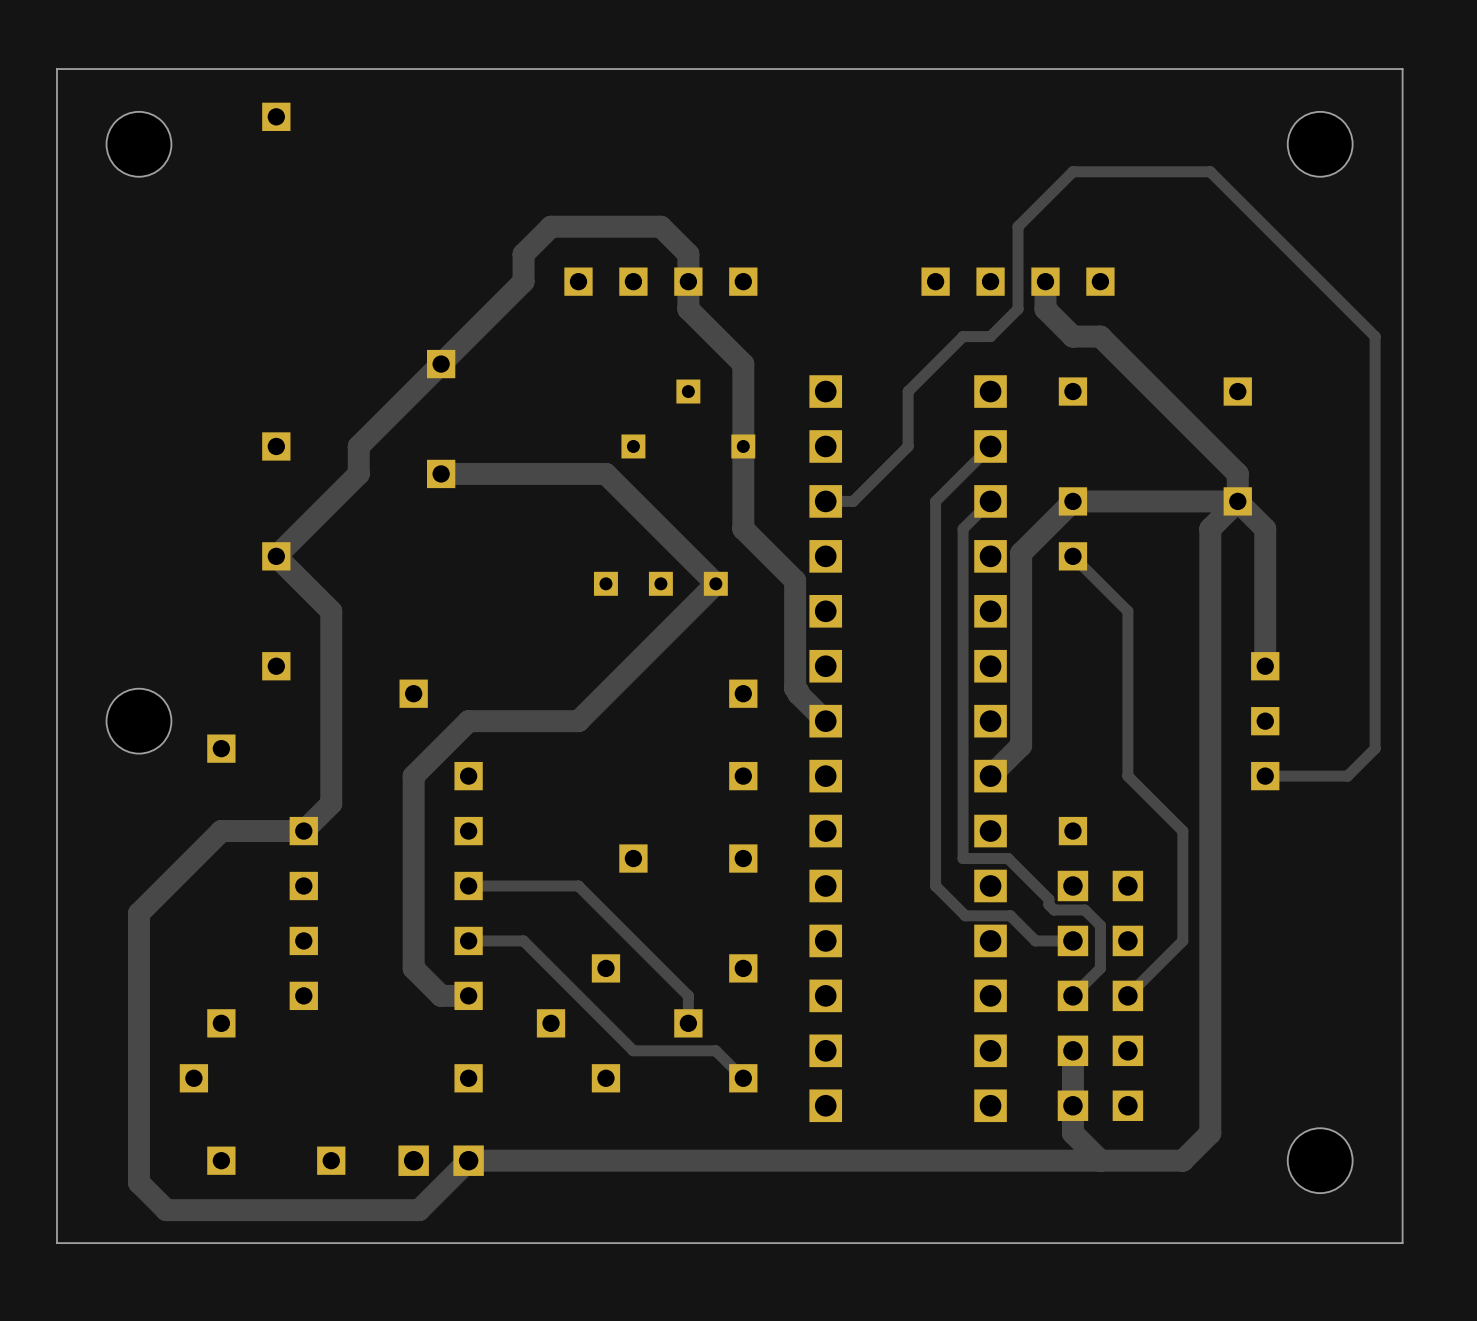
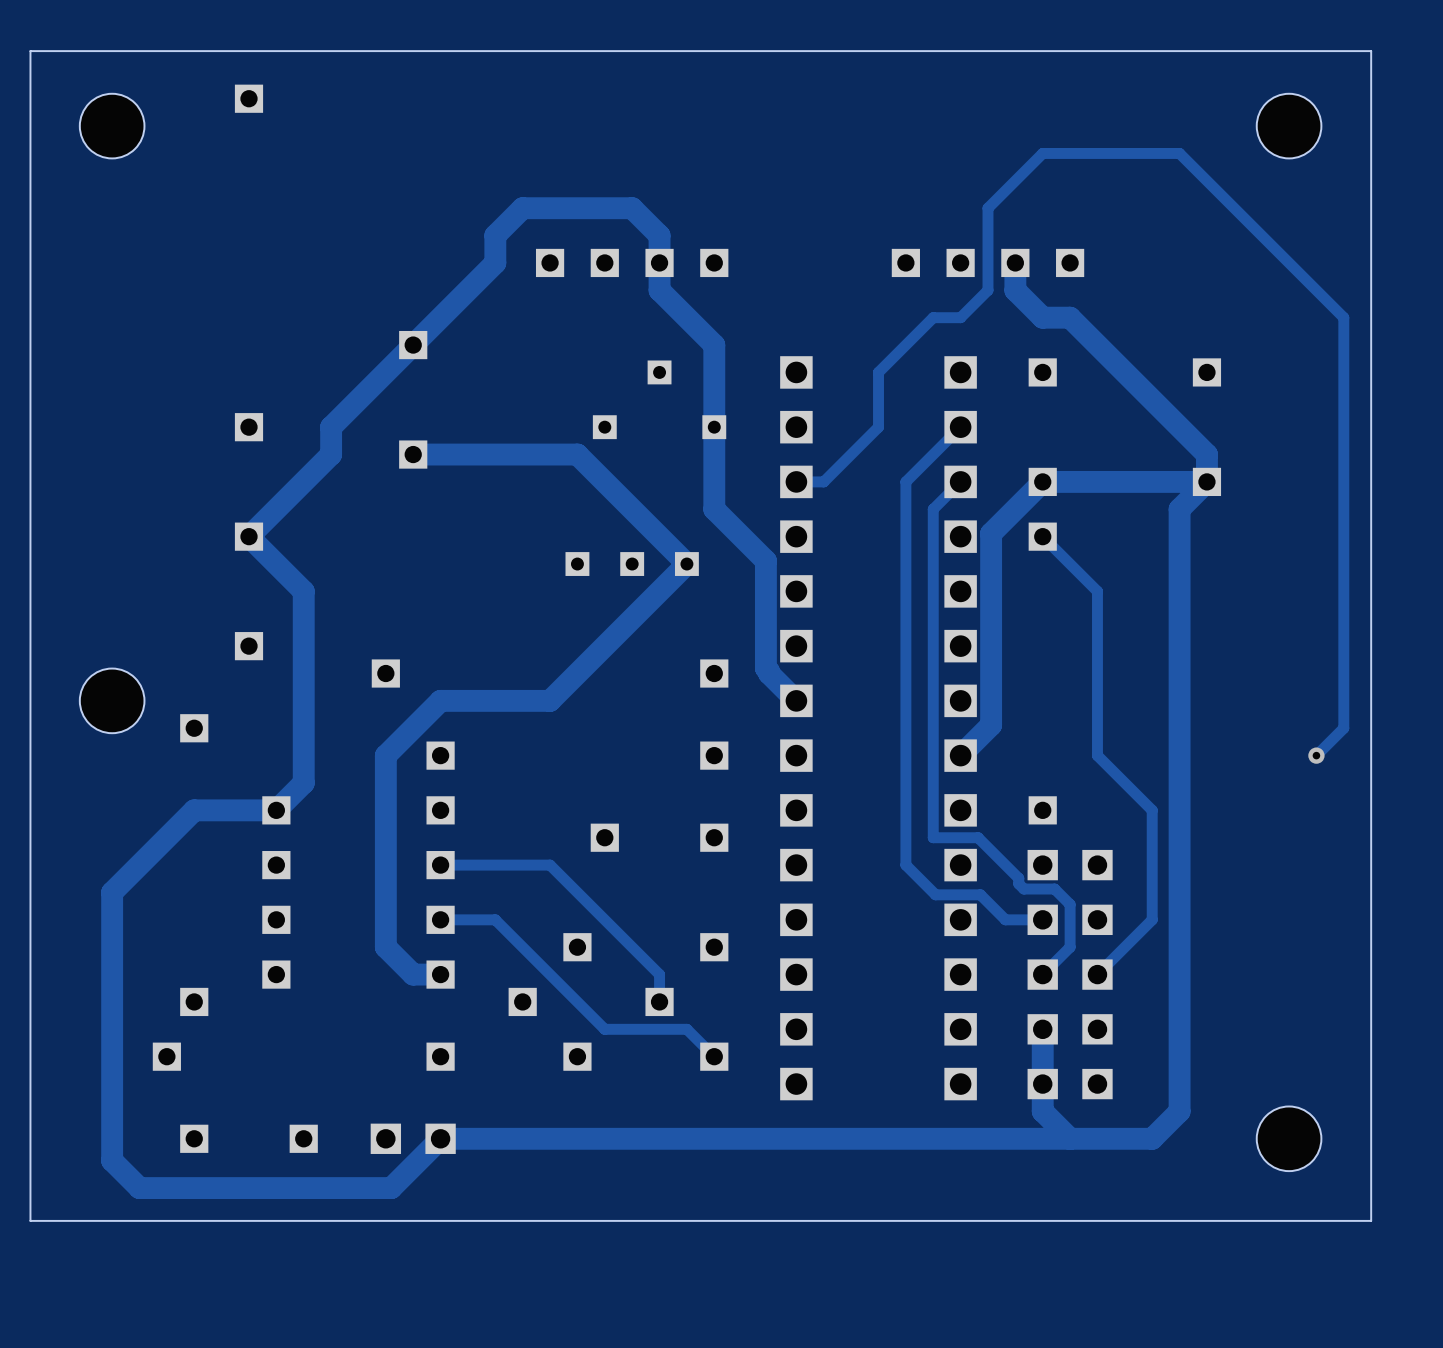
track: (1237, 501) (1265, 528) (1265, 666) -> none
part: (1265, 721) -> none
track: (1347, 776) (1265, 776) -> none
via: none -> (1316, 755)

